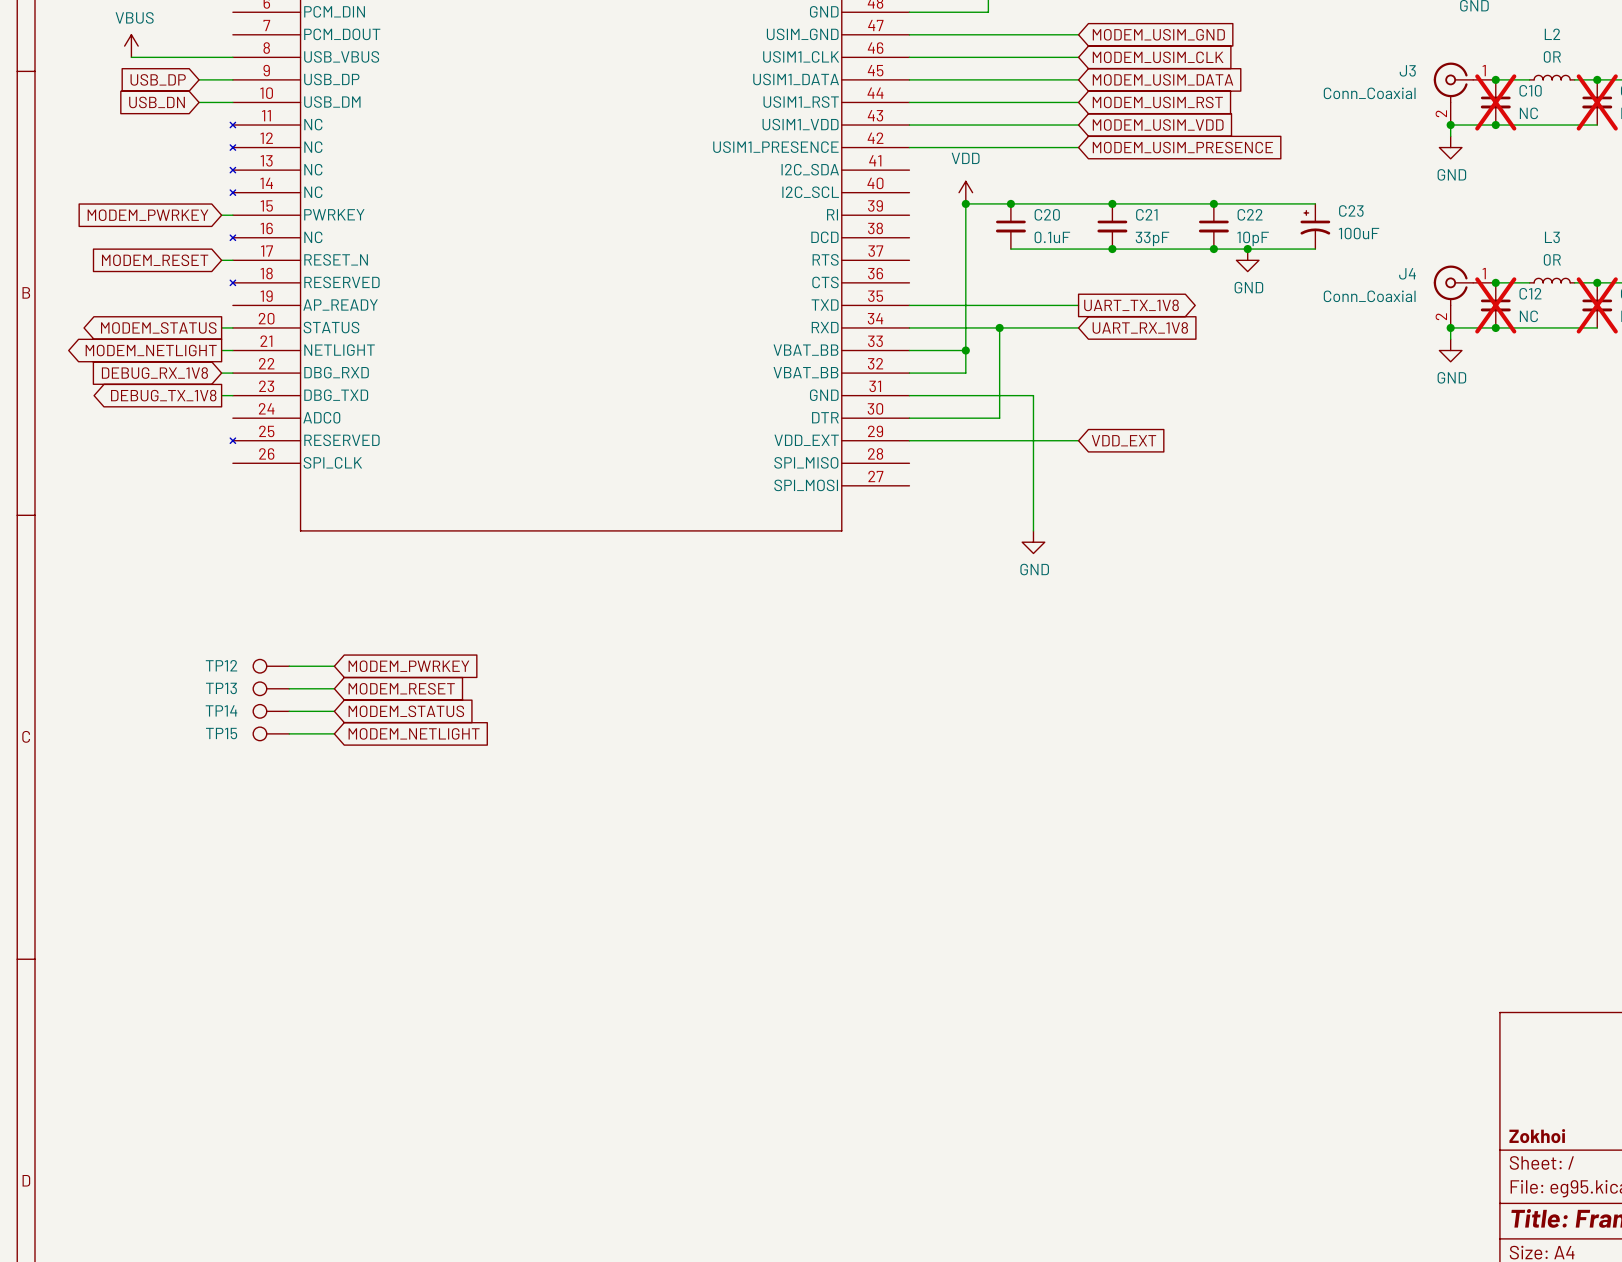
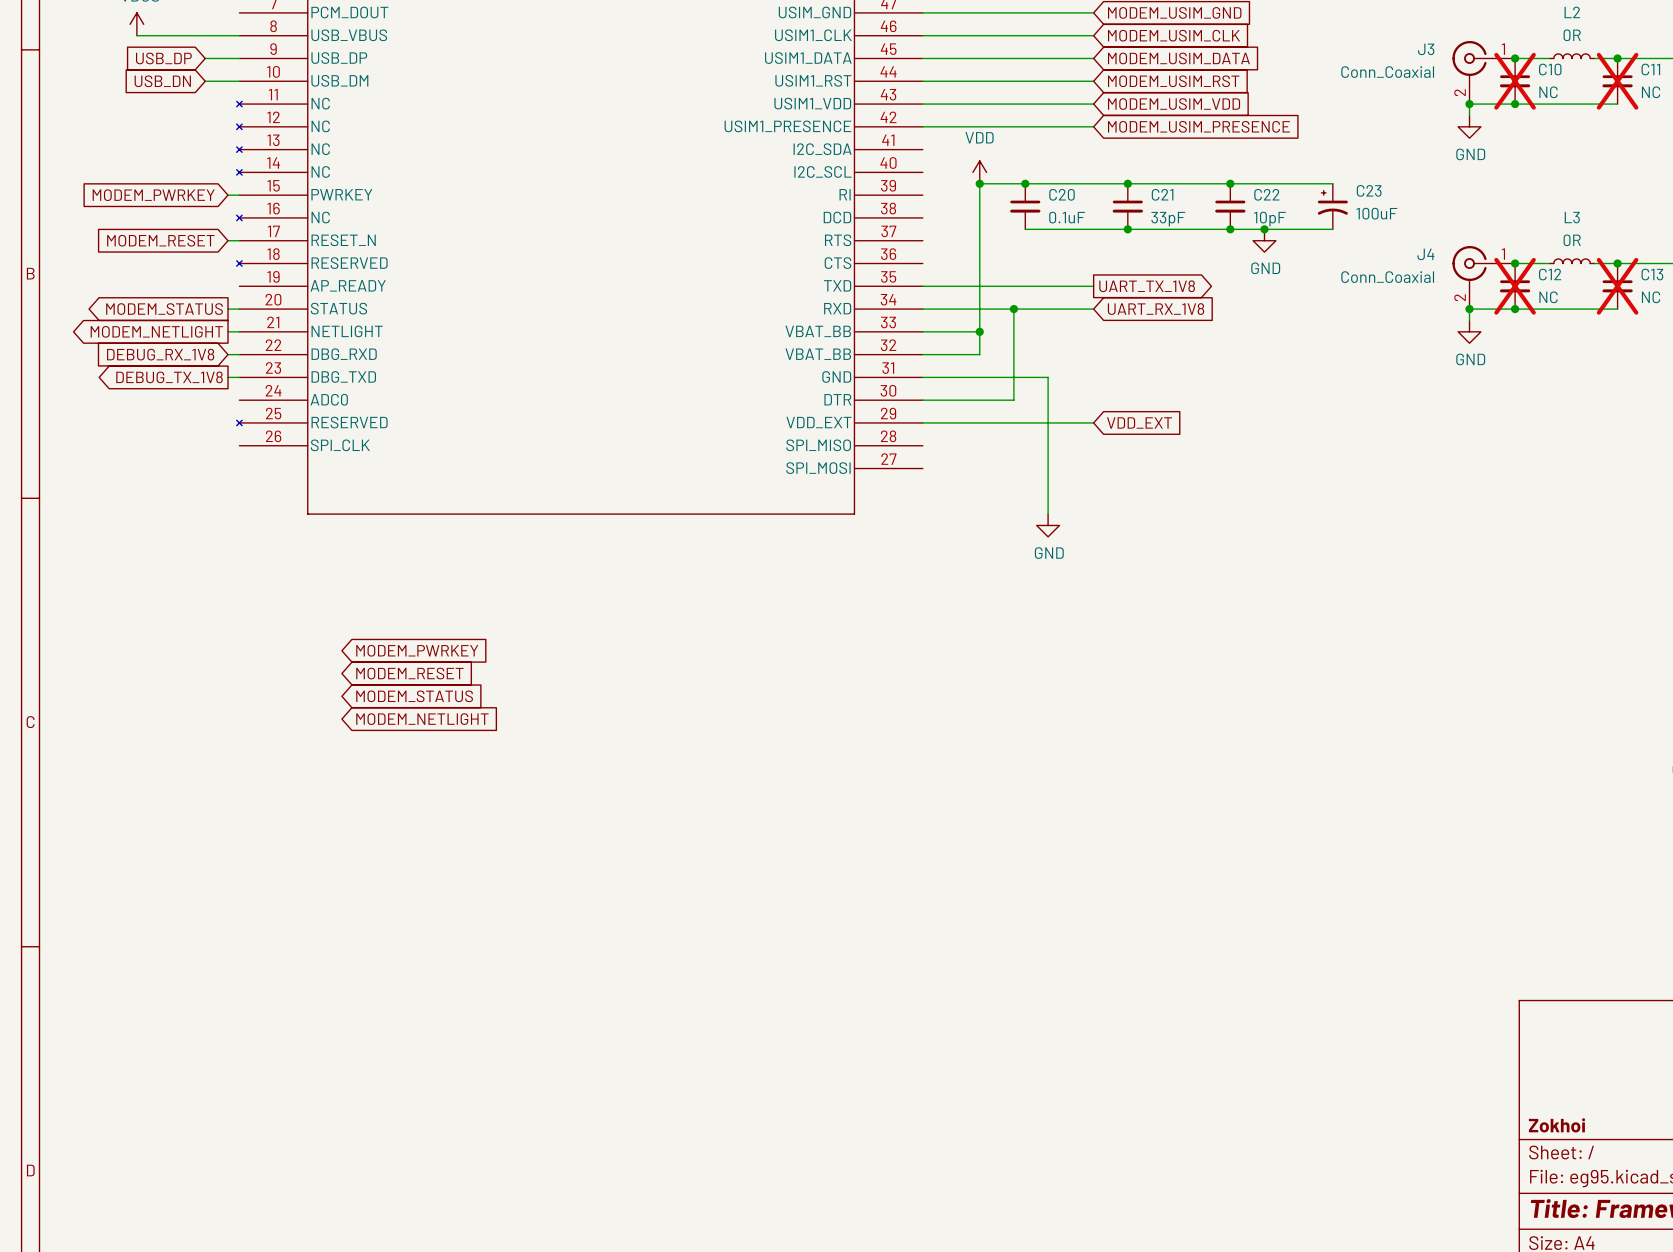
TP12: (271, 666) -> none
wire: (289, 666) (334, 666) -> none
TP13: (271, 688) -> none
wire: (289, 688) (334, 688) -> none
TP14: (271, 711) -> none
wire: (289, 711) (334, 711) -> none
TP15: (271, 733) -> none
wire: (289, 733) (334, 733) -> none

